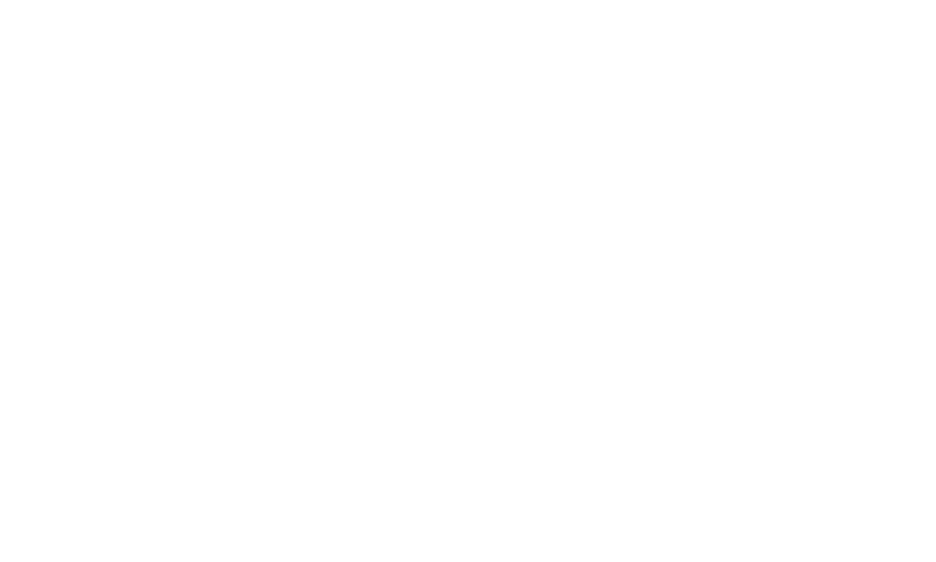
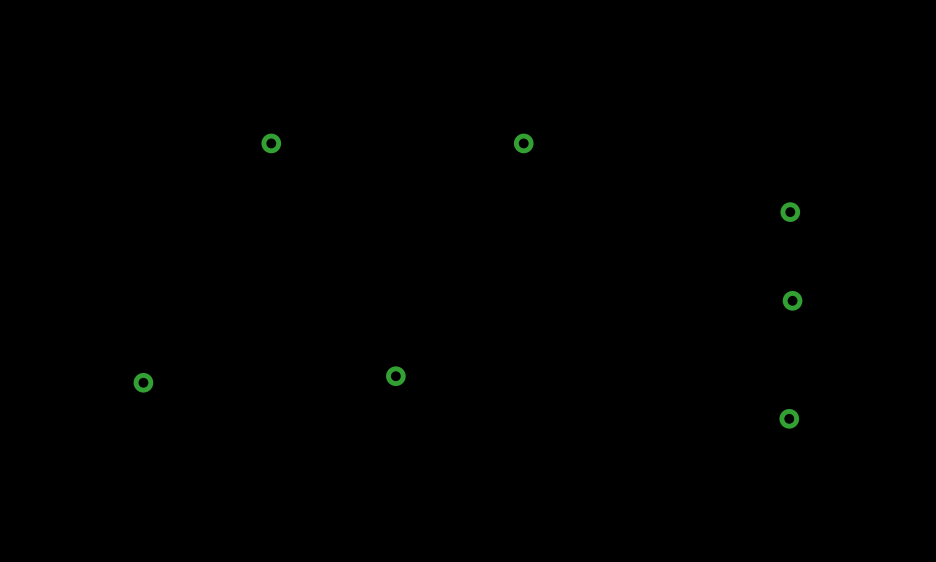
via: none -> (271, 143)
via: none -> (523, 143)
via: none -> (790, 212)
via: none -> (792, 300)
via: none -> (395, 376)
via: none -> (143, 382)
via: none -> (789, 418)

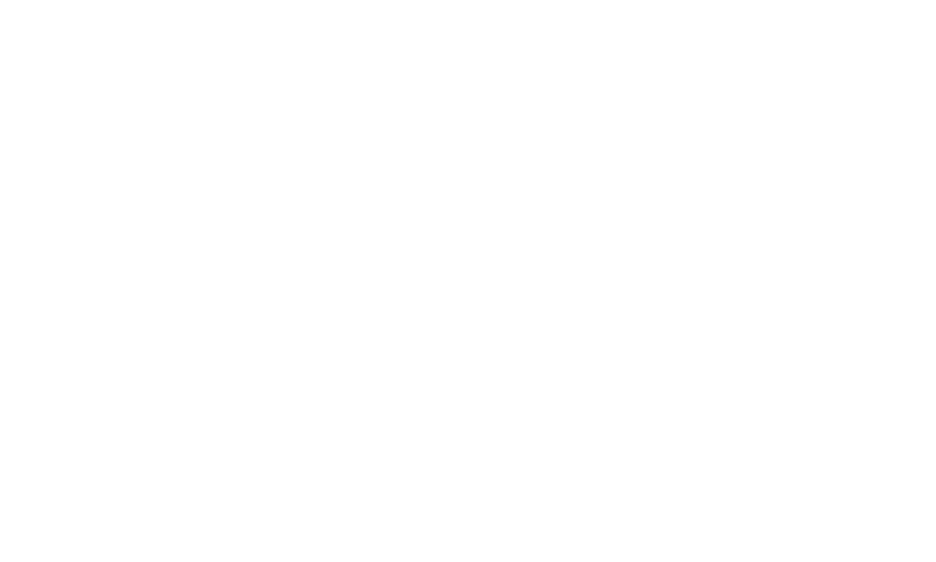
via: (271, 143) -> none
via: (523, 143) -> none
via: (790, 212) -> none
via: (792, 300) -> none
via: (395, 376) -> none
via: (143, 382) -> none
via: (789, 418) -> none

